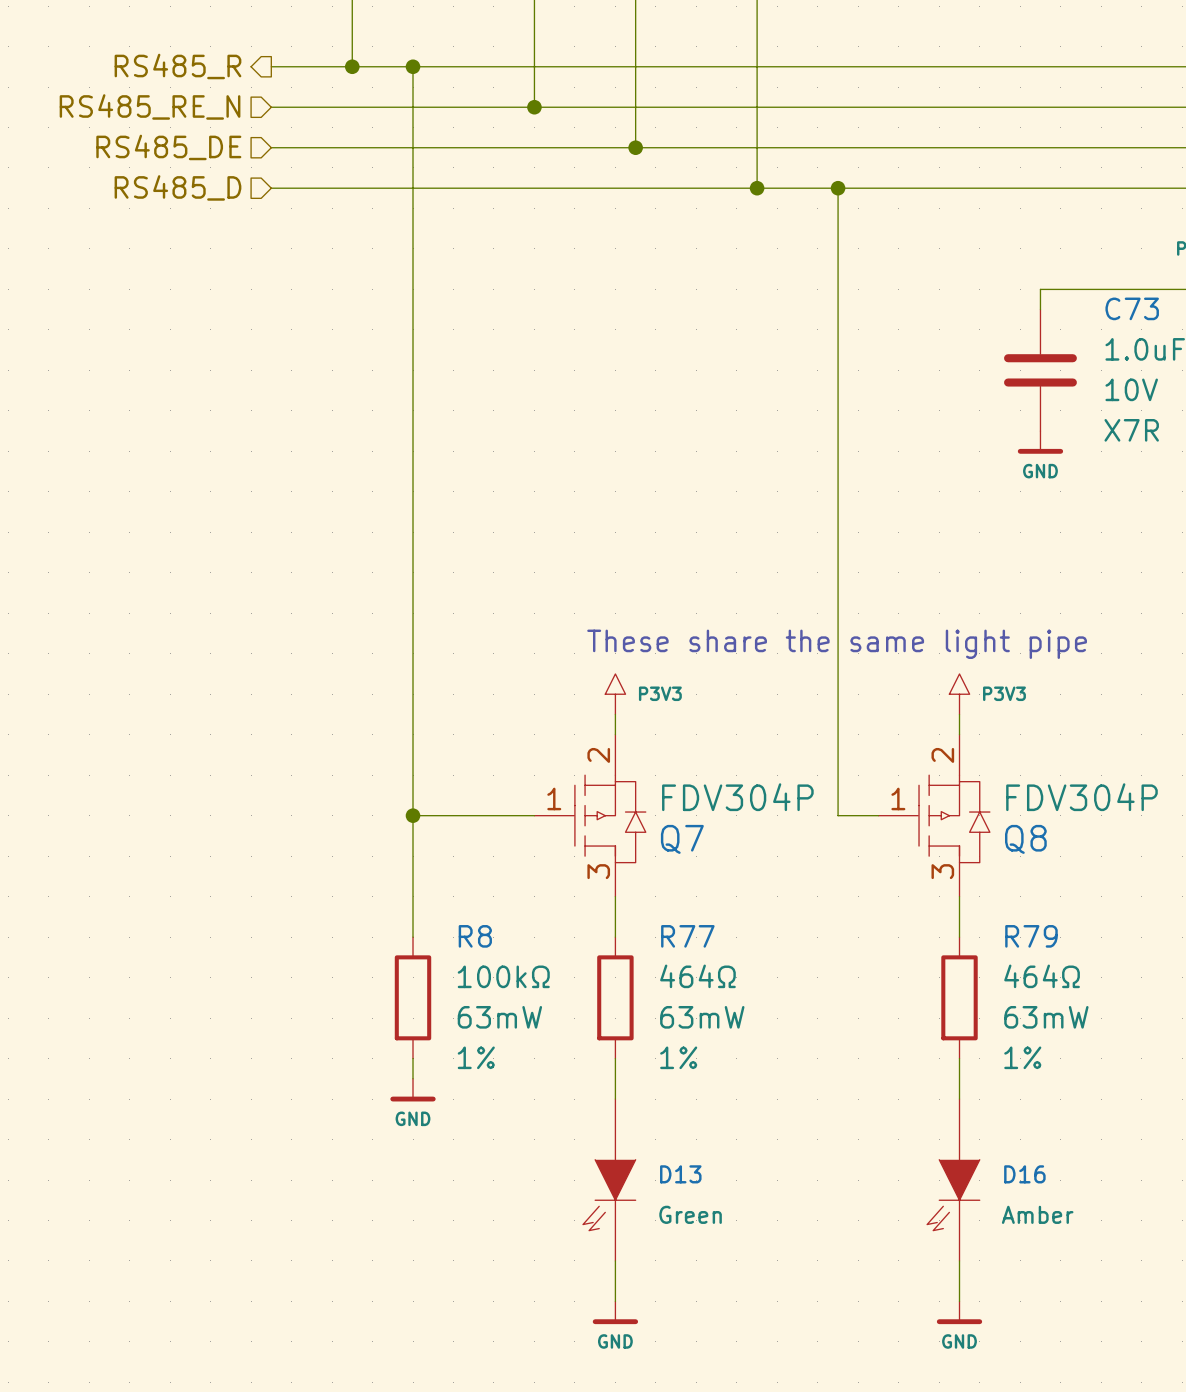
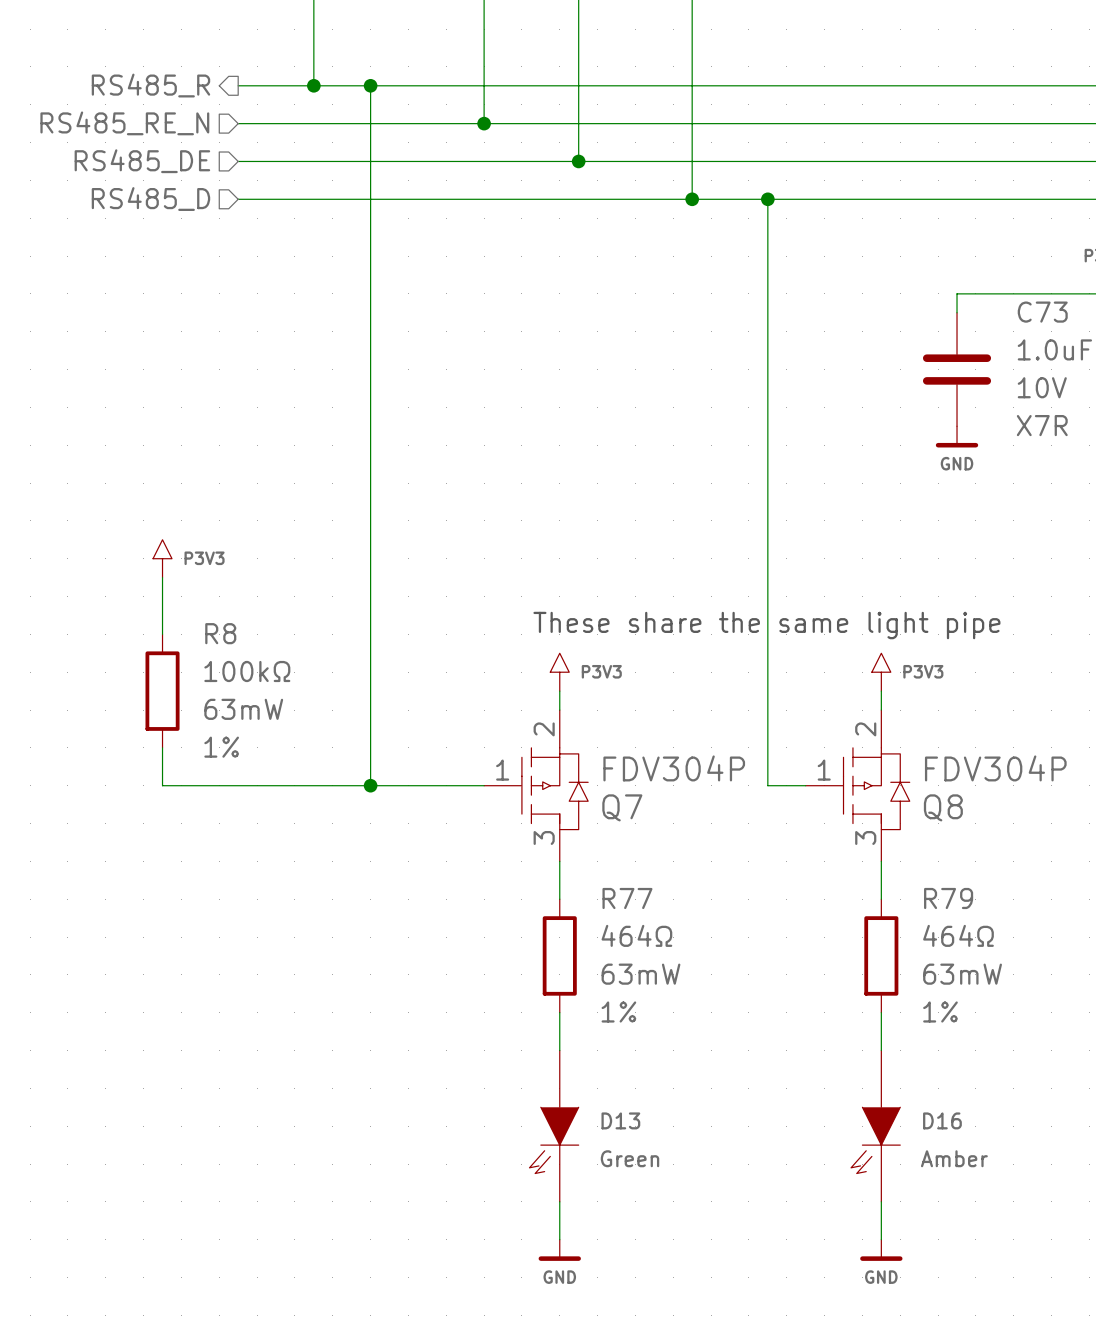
power symbol: none -> P3V3 (162, 558)
wire: none -> (162, 577) (162, 634)
wire: (413, 815) (413, 937) -> (370, 785) (162, 785) (162, 747)
R8 position: (413, 997) -> (162, 691)
wire: (413, 1058) (413, 1078) -> none
power symbol: GND (413, 1090) -> none

